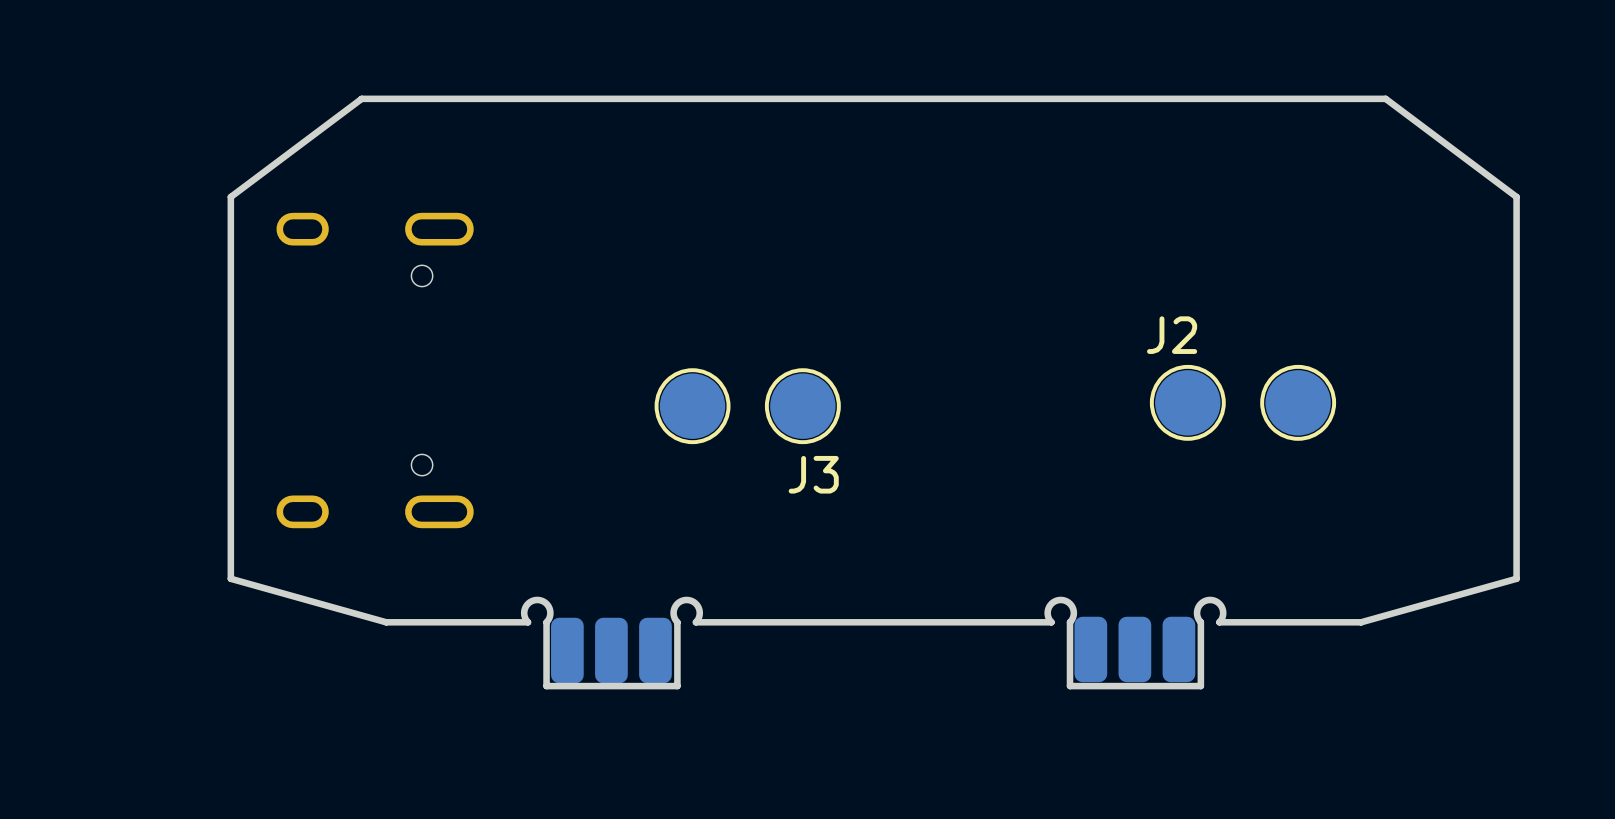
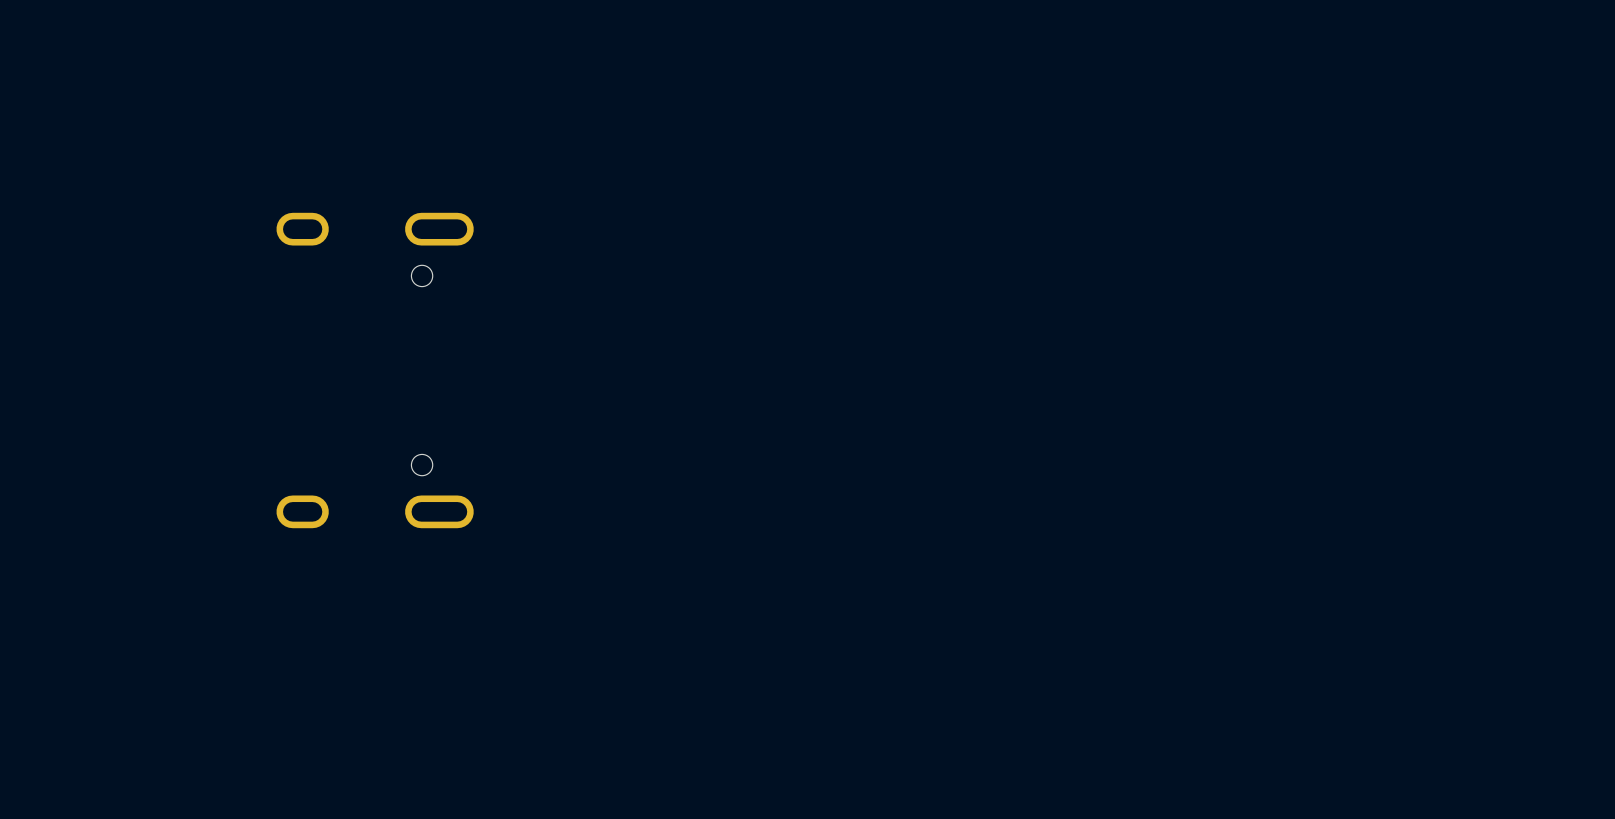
board edge: (1385, 98) (361, 98) (230, 196) (230, 578) (386, 622) (528, 622) (524, 613) (526, 605) (534, 600) (542, 600) (548, 605) (550, 611) (546, 622) (546, 686) (677, 686) (677, 622) (673, 611) (677, 603) (686, 599) (694, 602) (699, 608) (699, 616) (695, 622) (1051, 622) (1047, 615) (1048, 607) (1054, 601) (1062, 600) (1070, 604) (1073, 611) (1070, 622) (1070, 686) (1200, 686) (1200, 622) (1197, 611) (1200, 604) (1205, 600) (1213, 600) (1221, 605) (1223, 615) (1219, 622) (1361, 622) (1516, 578) (1516, 196) (1385, 98) -> none
J2: (1242, 402) -> none
J3: (747, 406) -> none
part: (1134, 649) -> none
part: (611, 650) -> none

